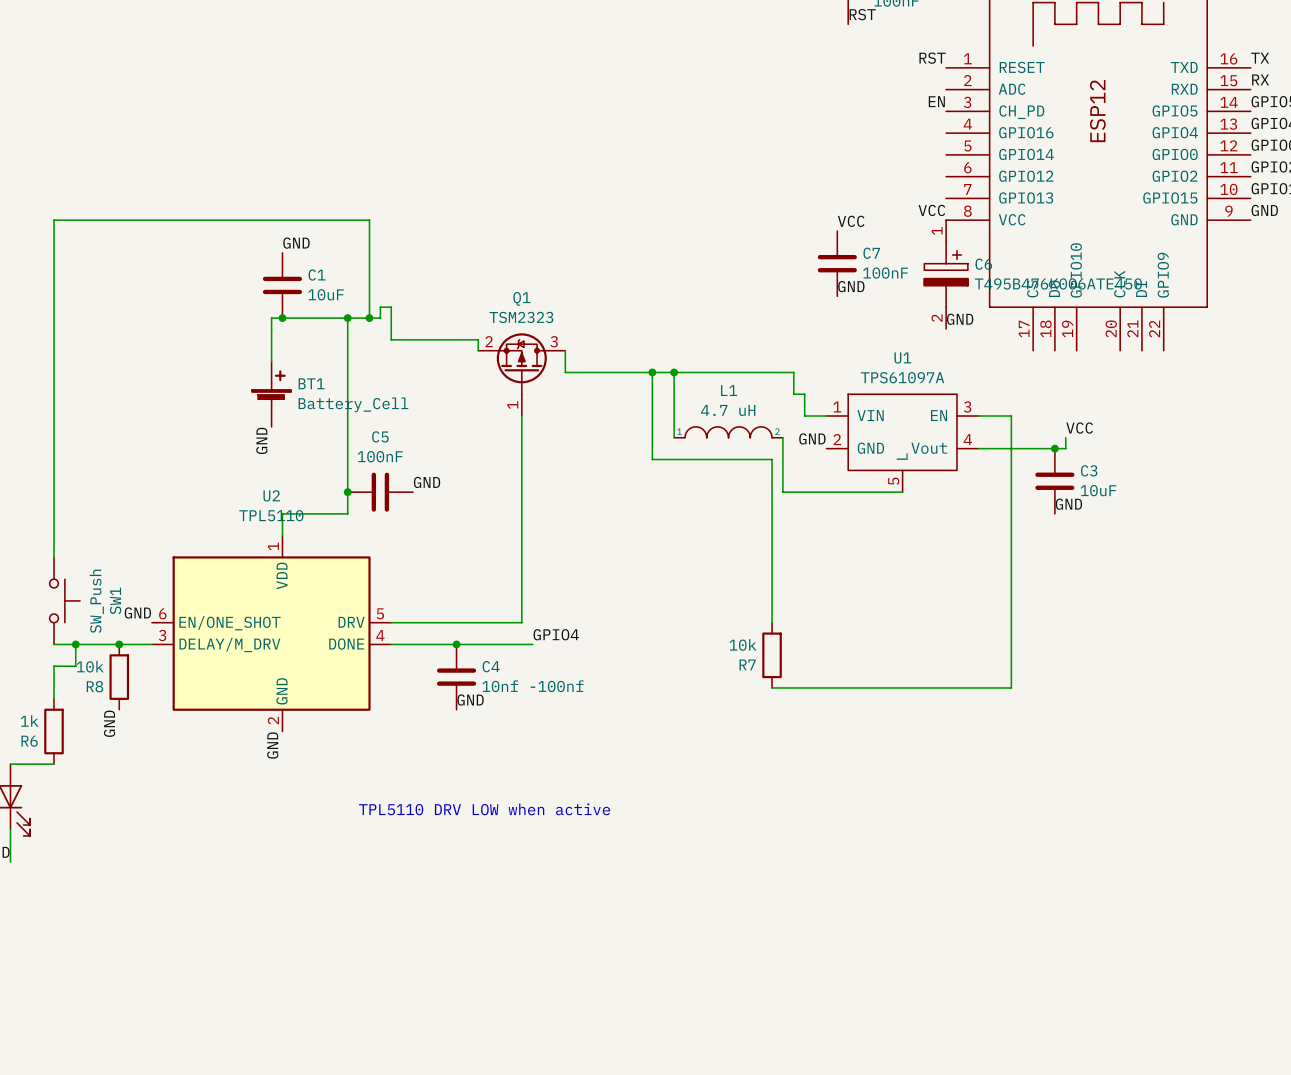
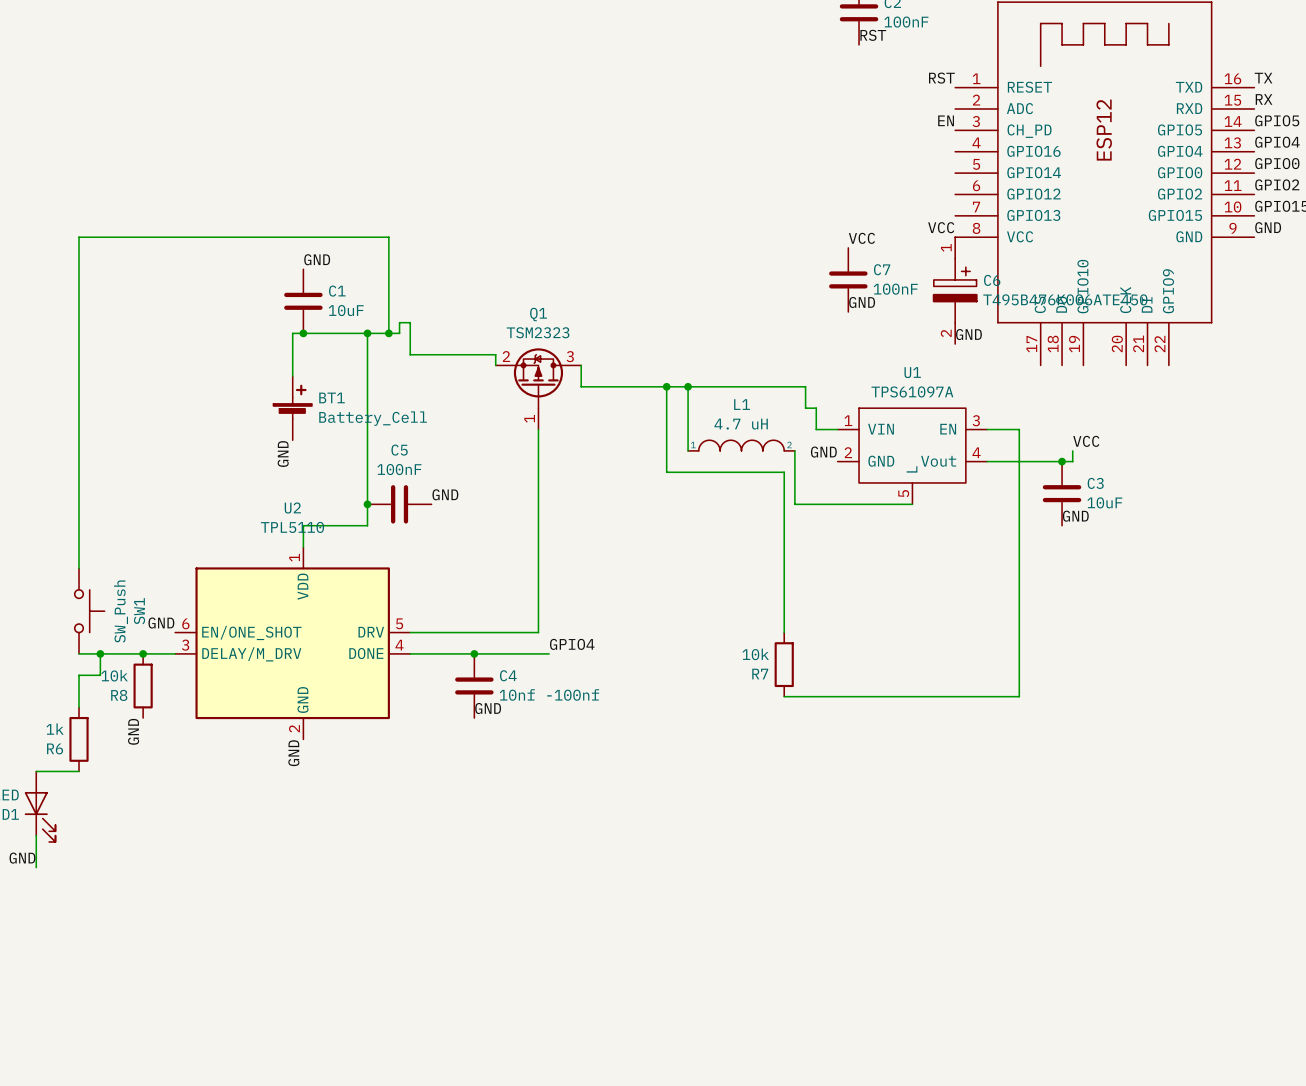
text: TPL5110 DRV LOW when active (484, 809) -> none

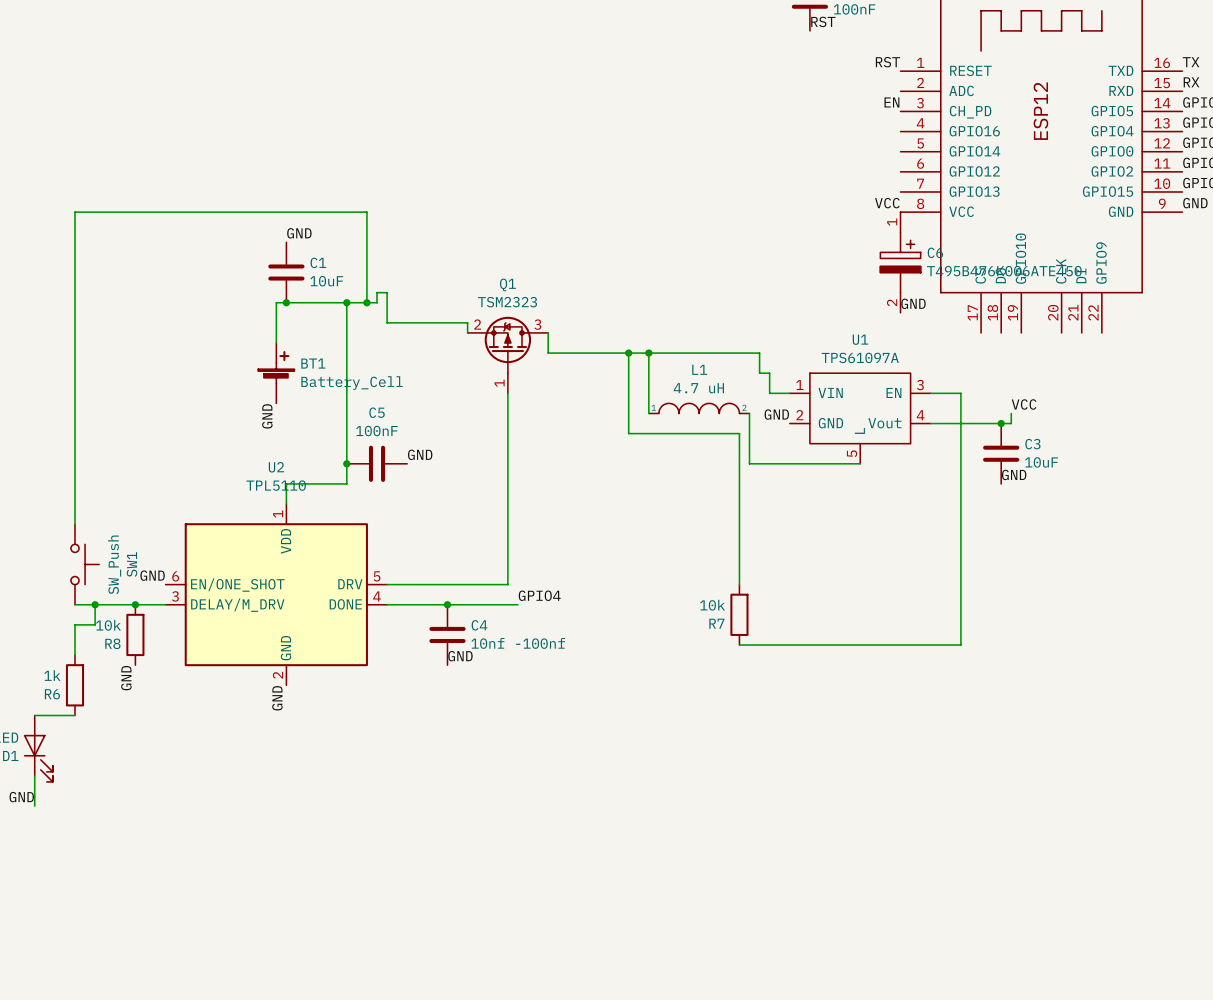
label: VCC (861, 238) -> none
C7: 100nF (848, 279) -> none
label: GND (862, 302) -> none

